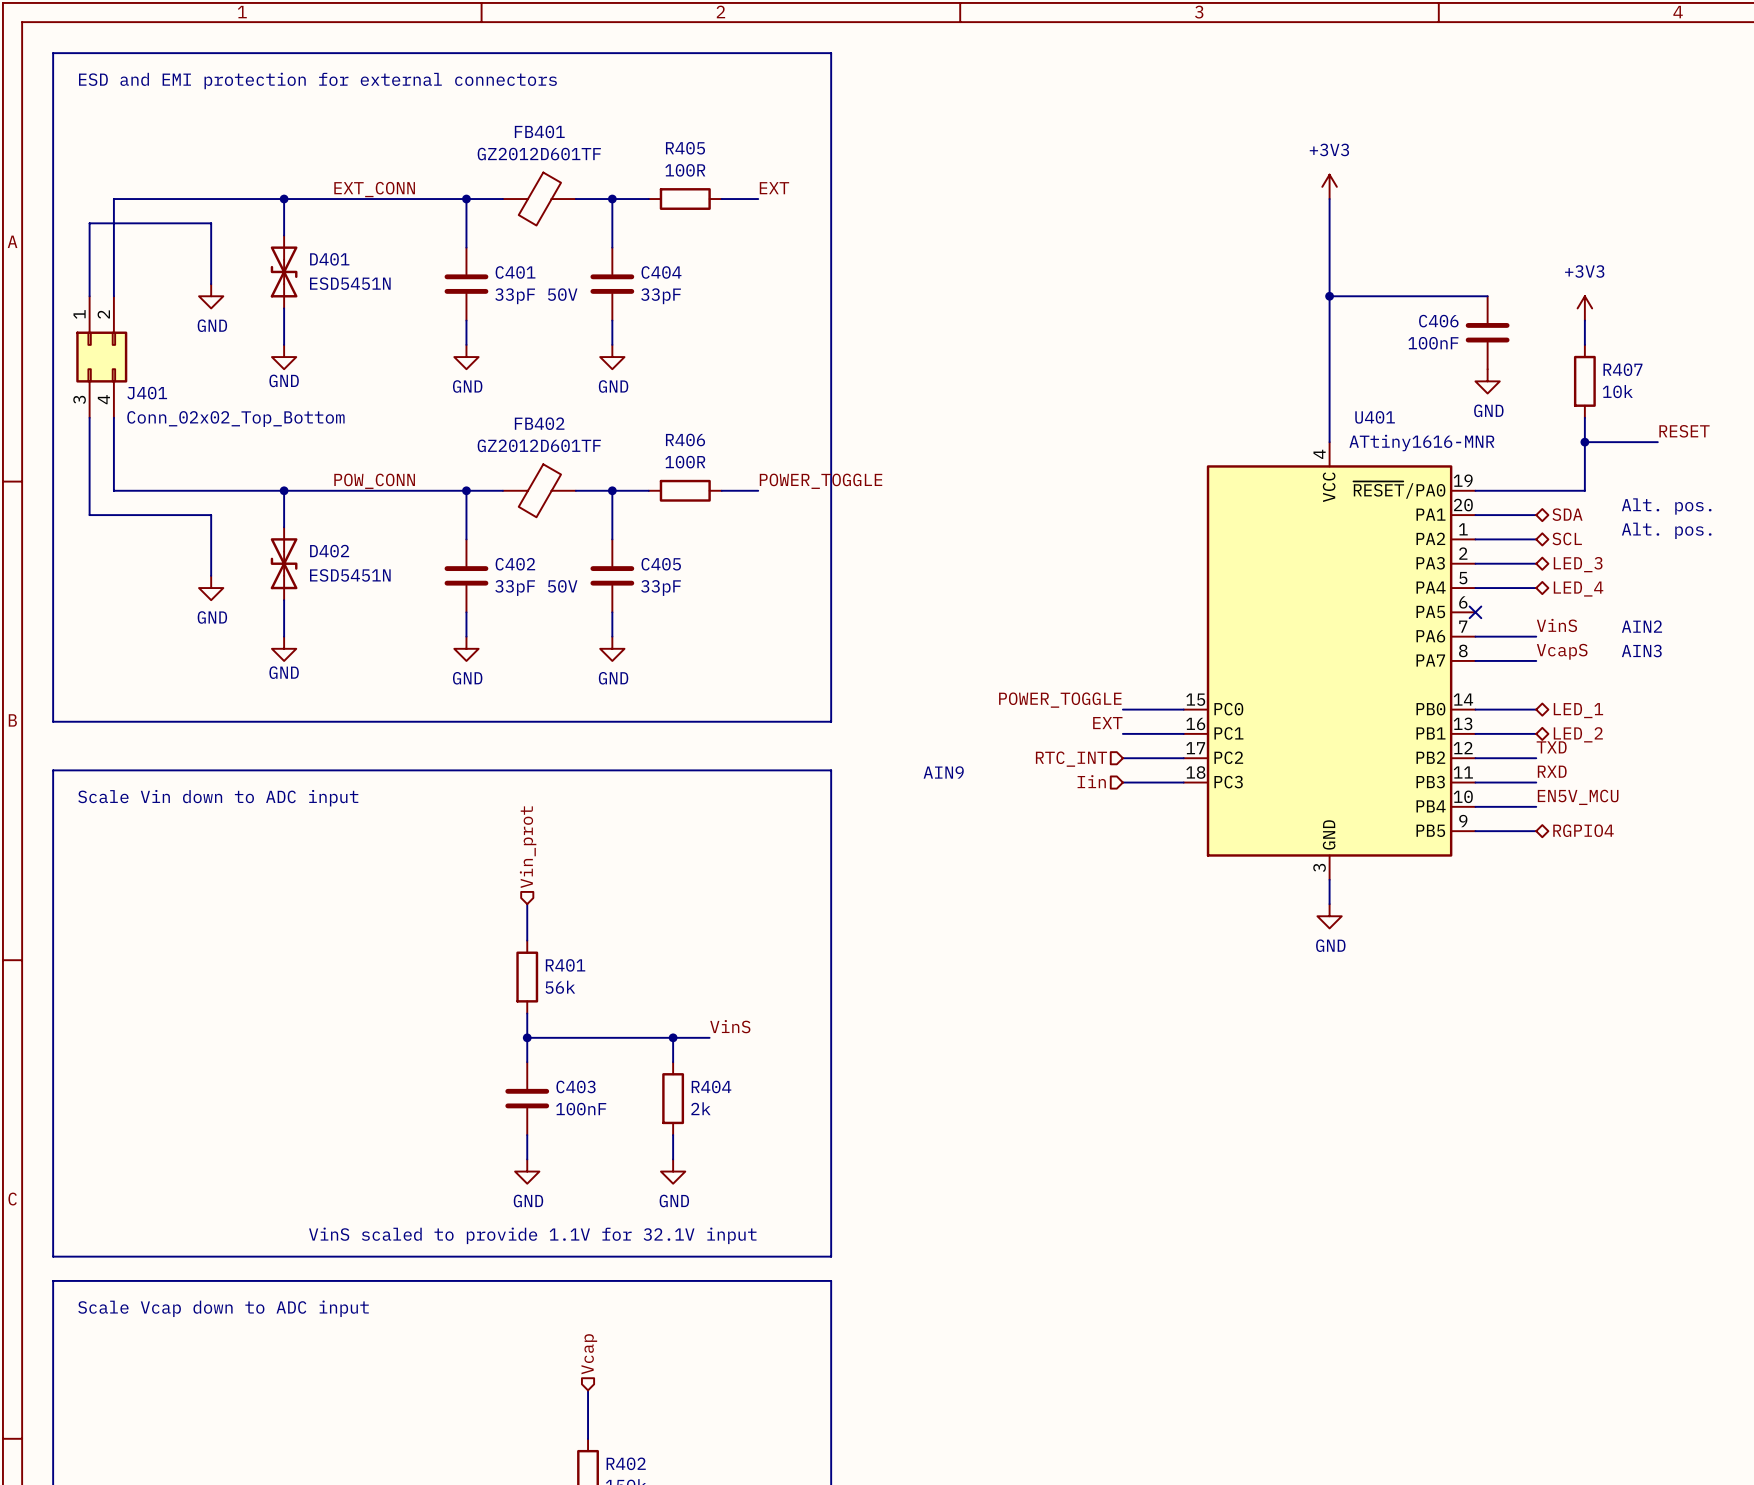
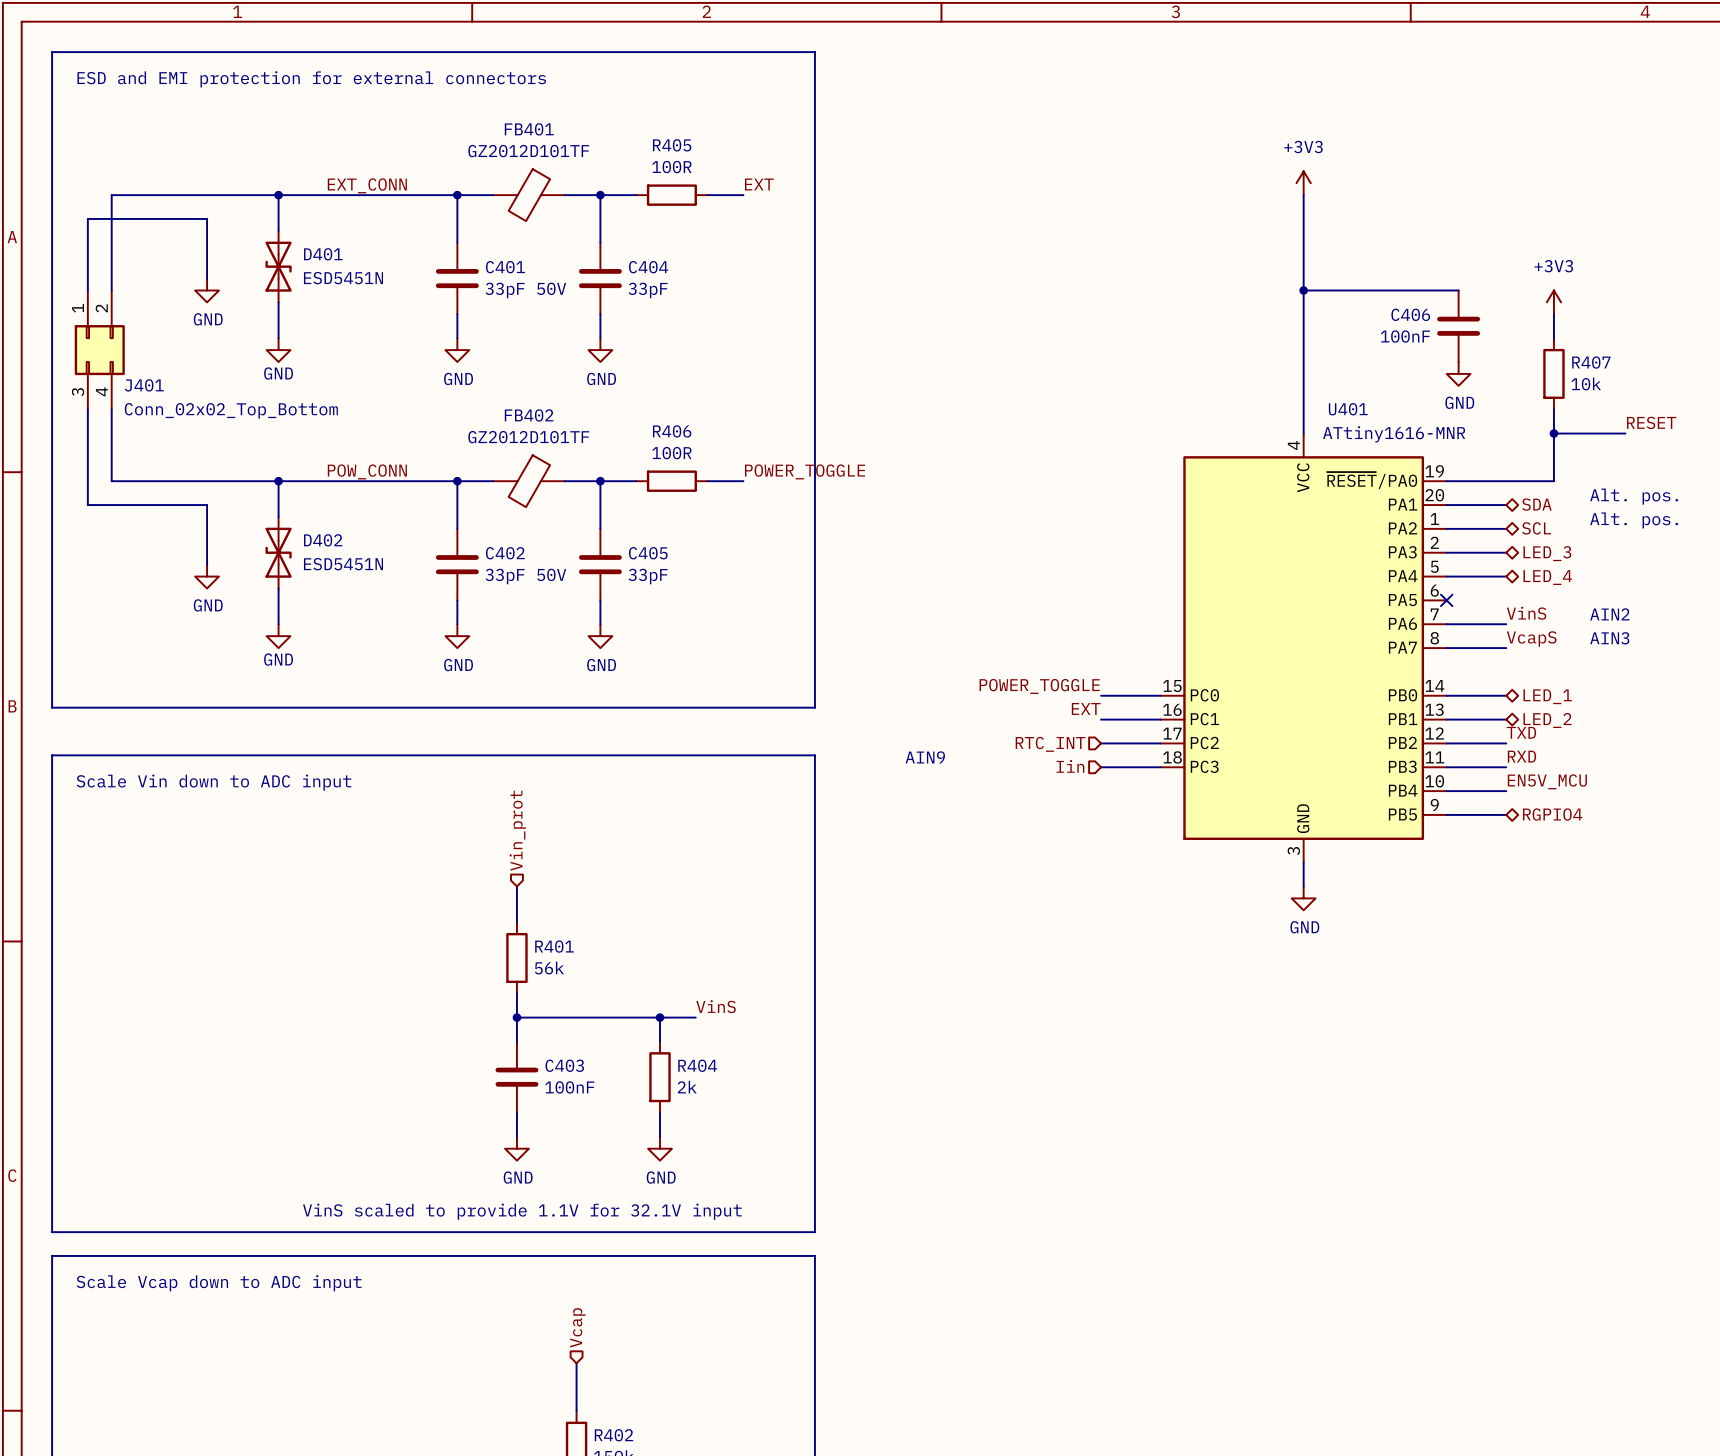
FB401 value: GZ2012D601TF (539, 154) -> GZ2012D101TF (528, 151)
FB402 value: GZ2012D601TF (539, 445) -> GZ2012D101TF (528, 437)

